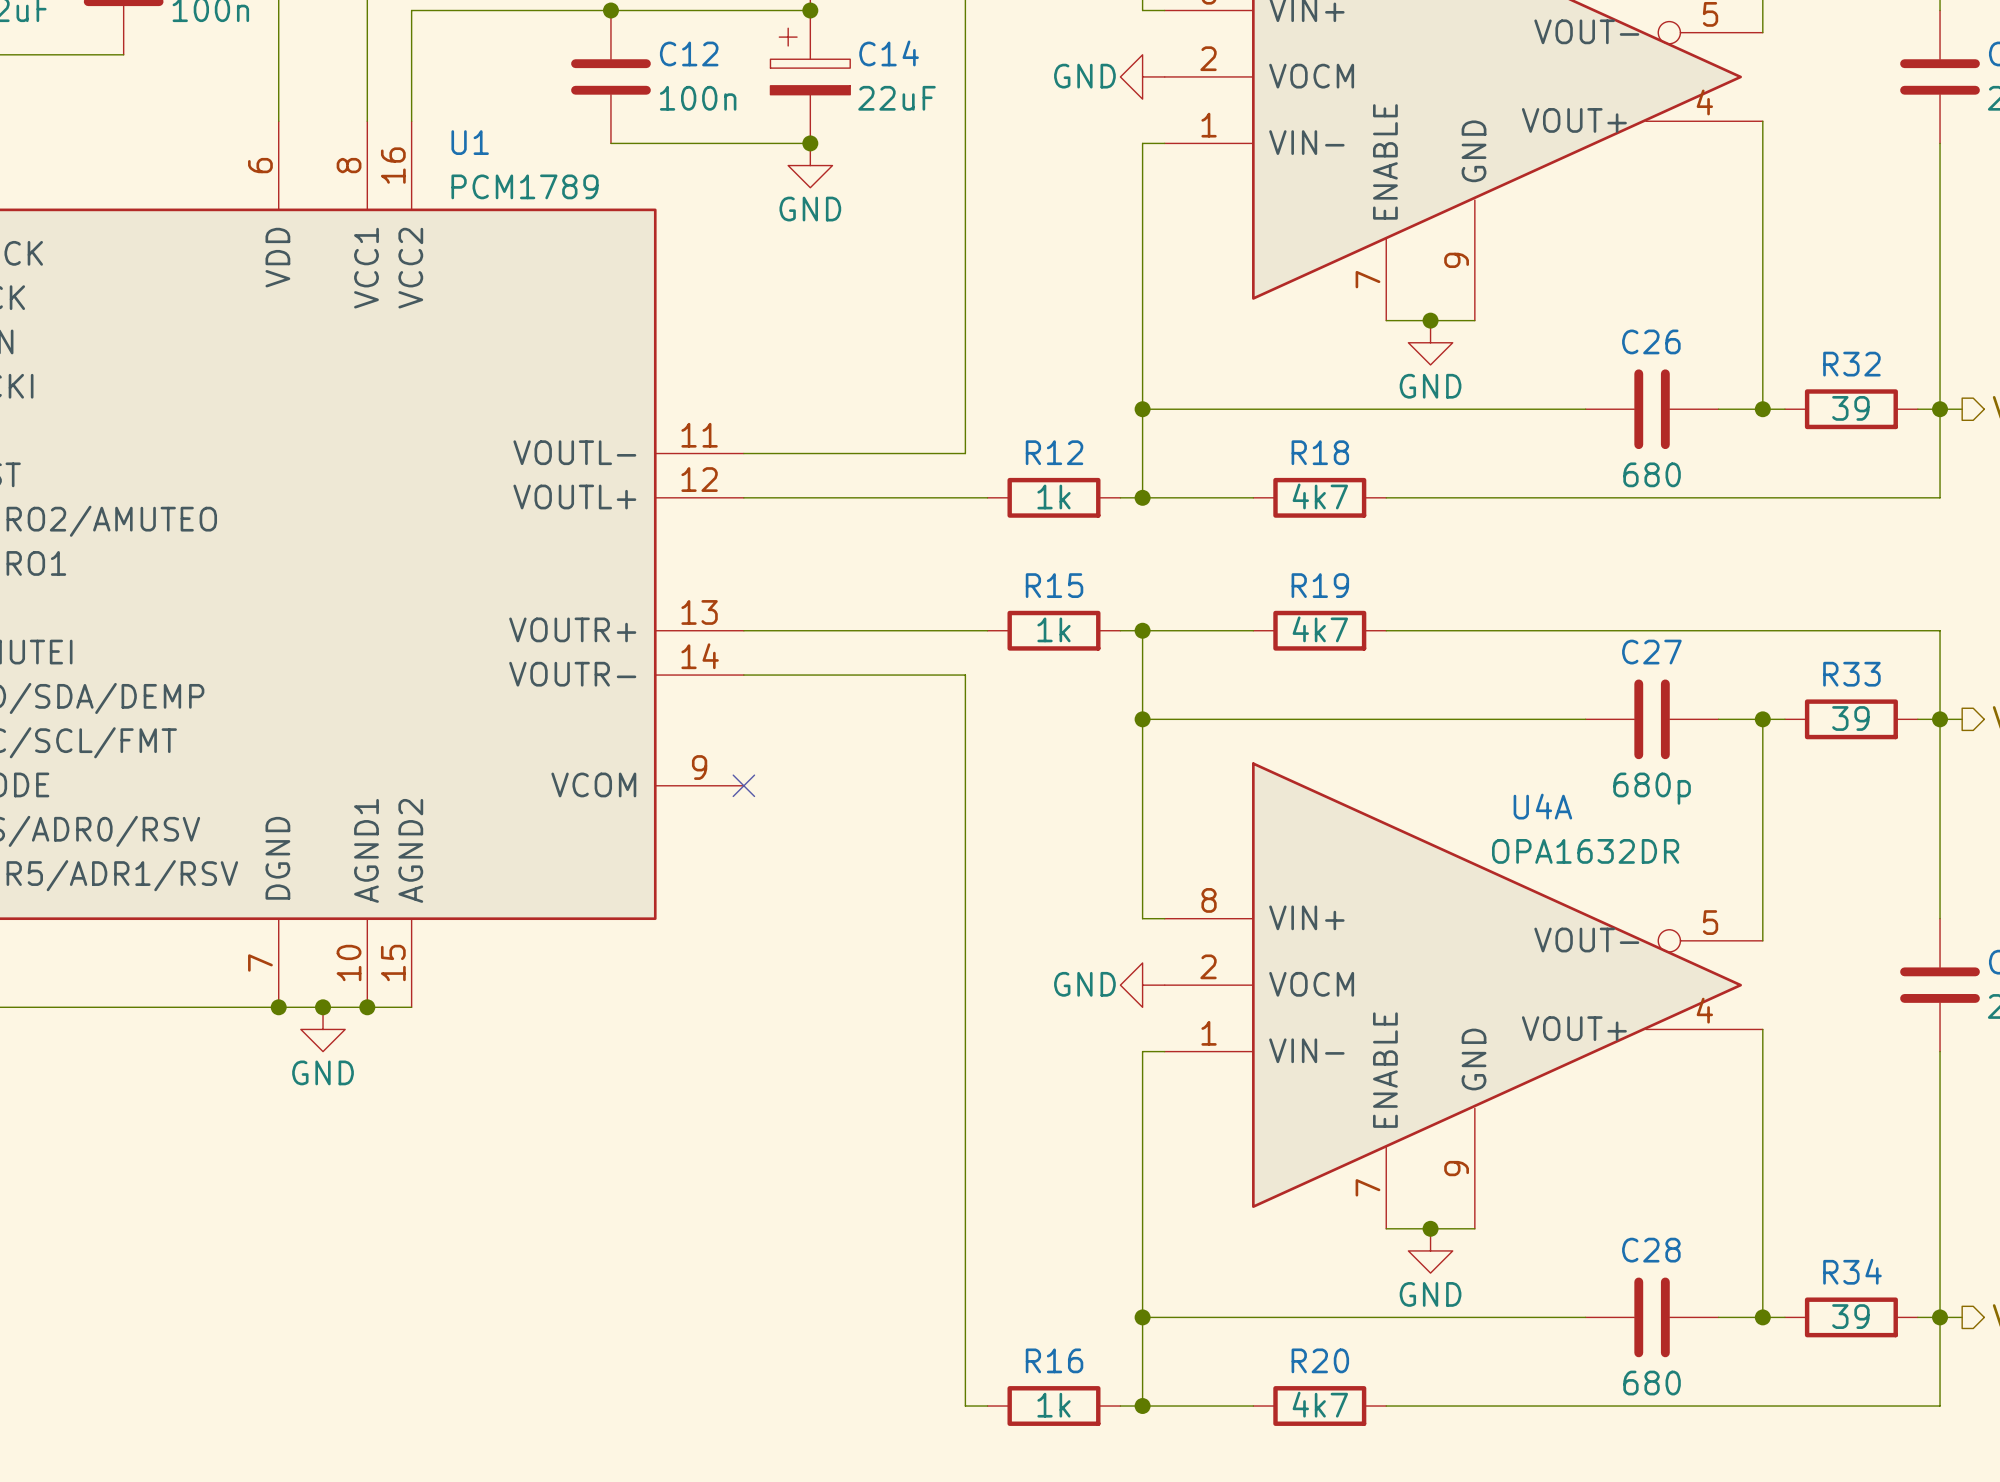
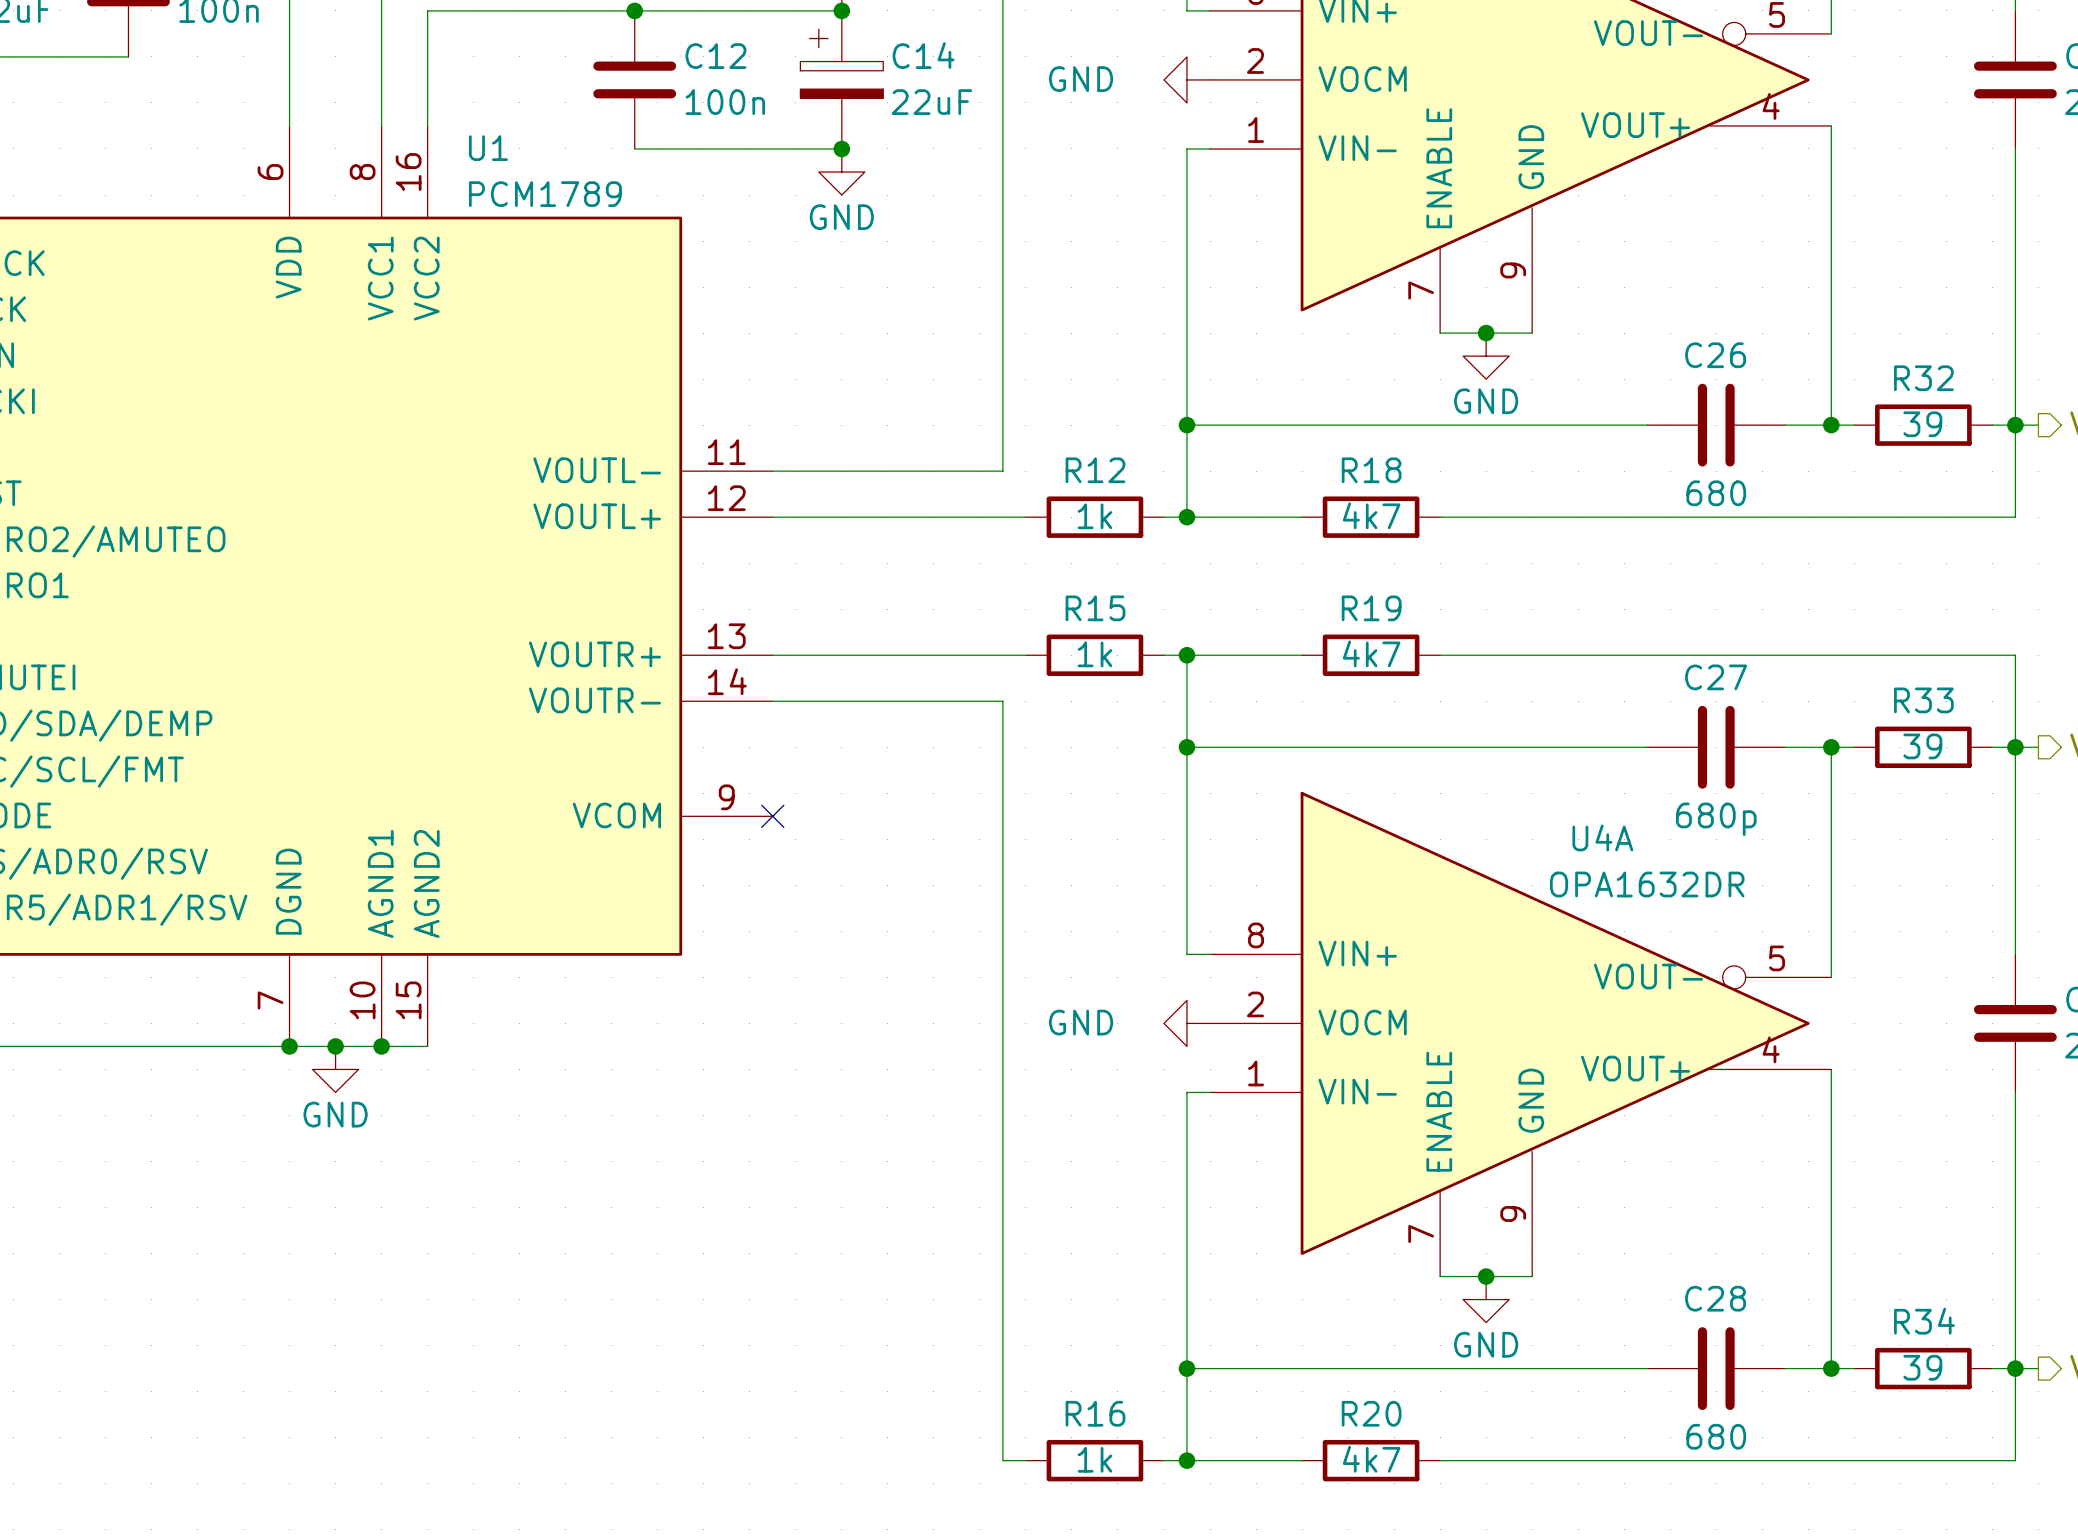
power symbol text position: GND (1084, 76) -> GND (1081, 79)
power symbol text position: GND (1084, 984) -> GND (1081, 1022)

